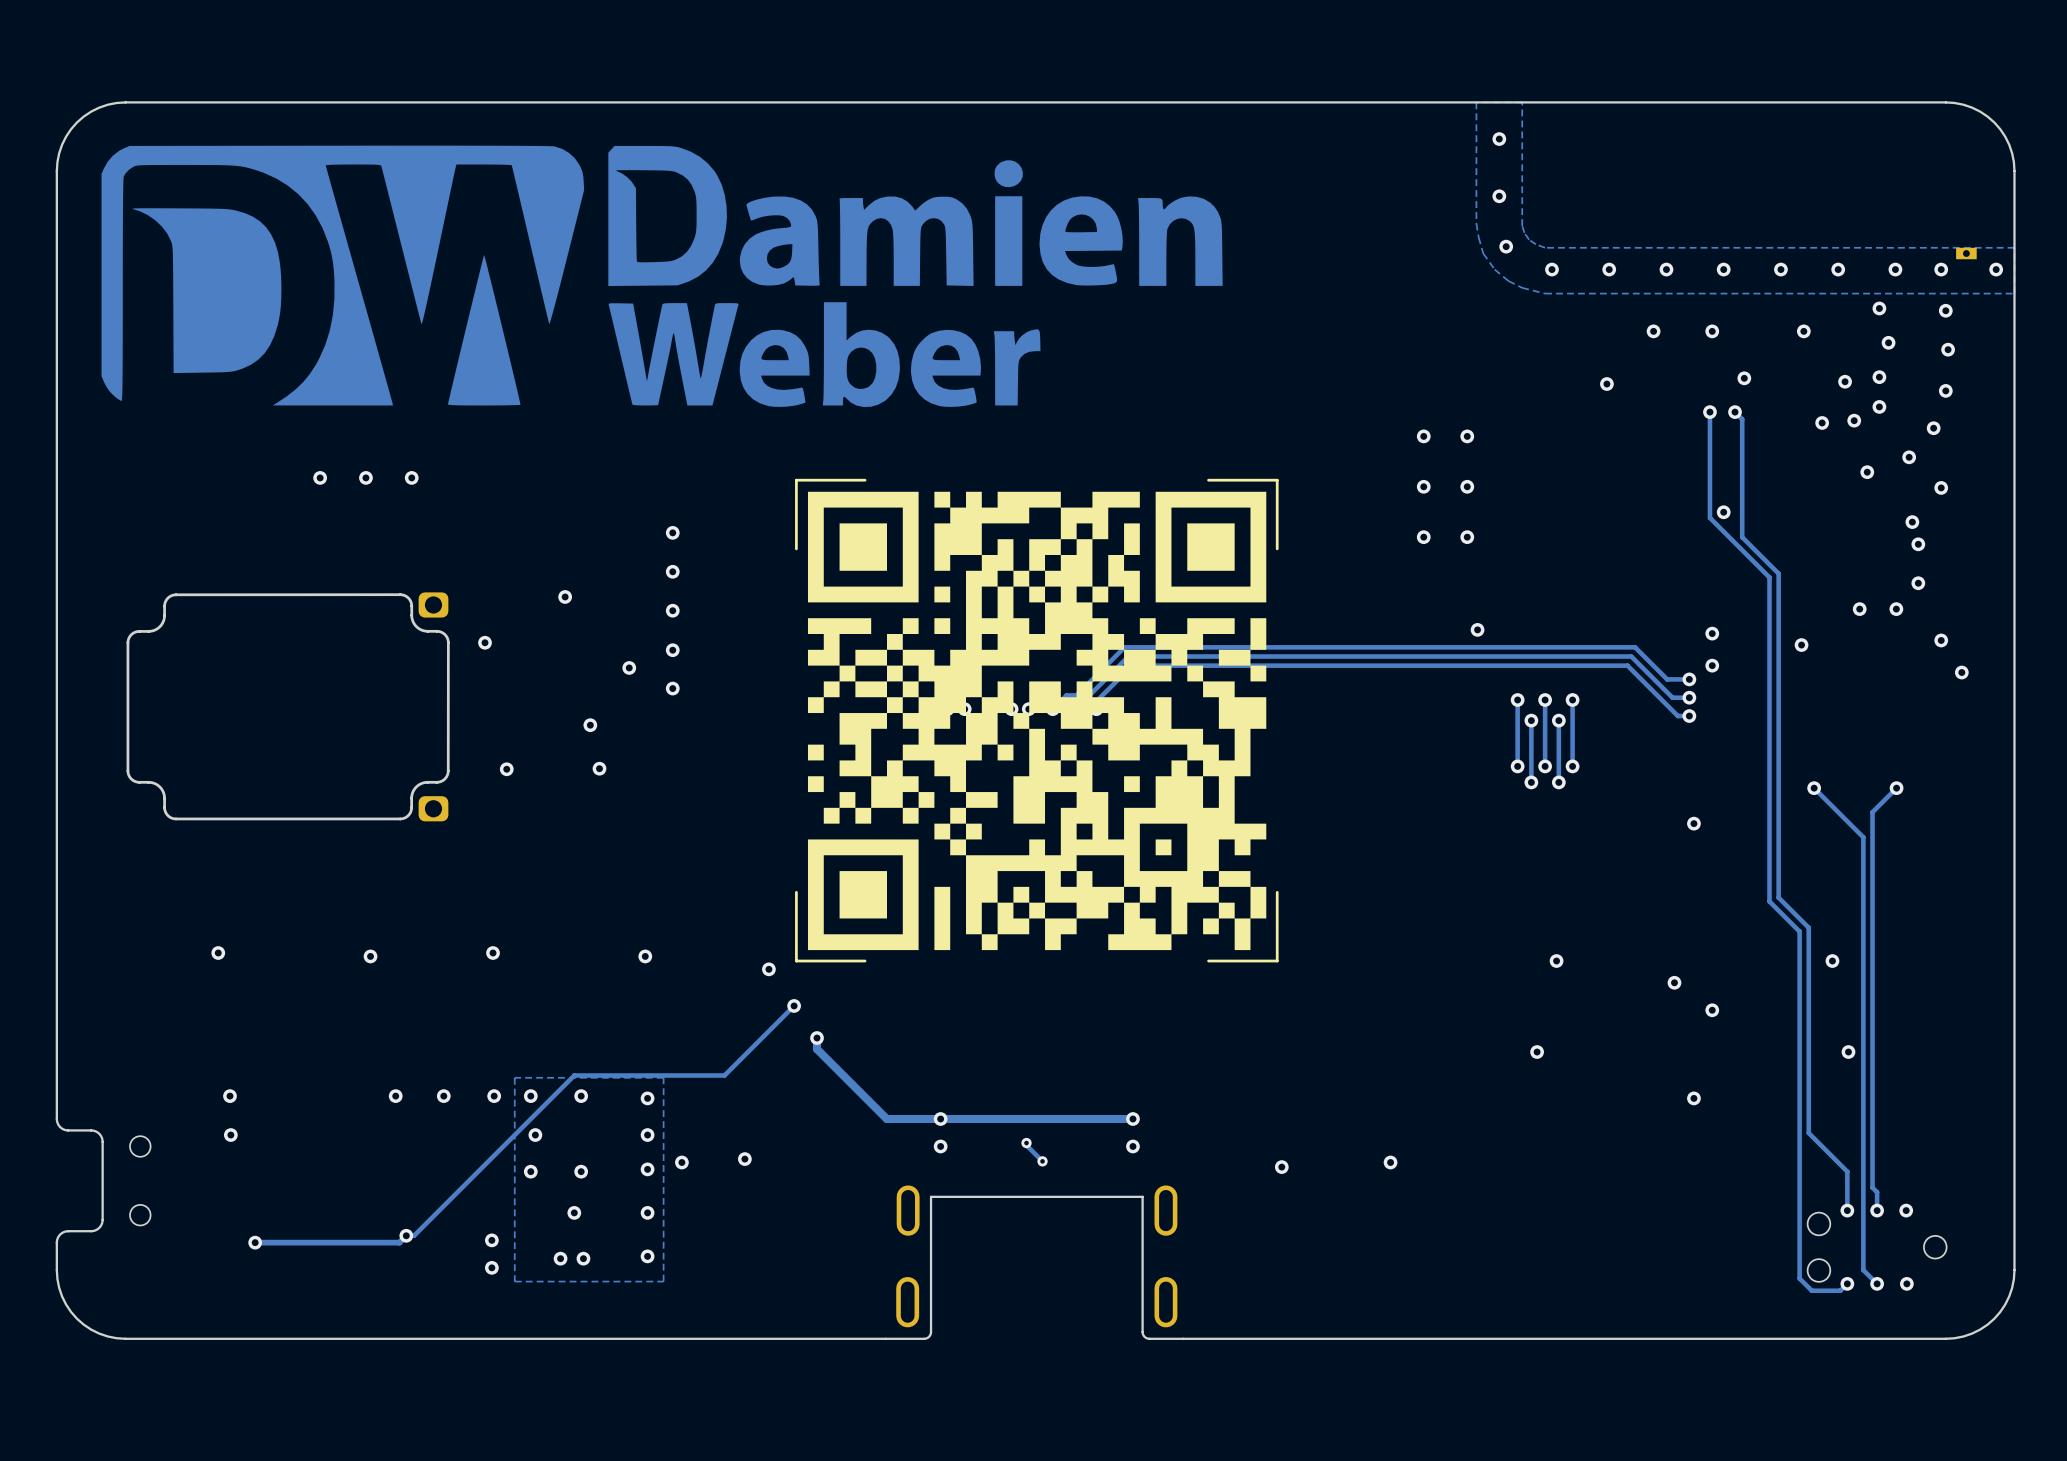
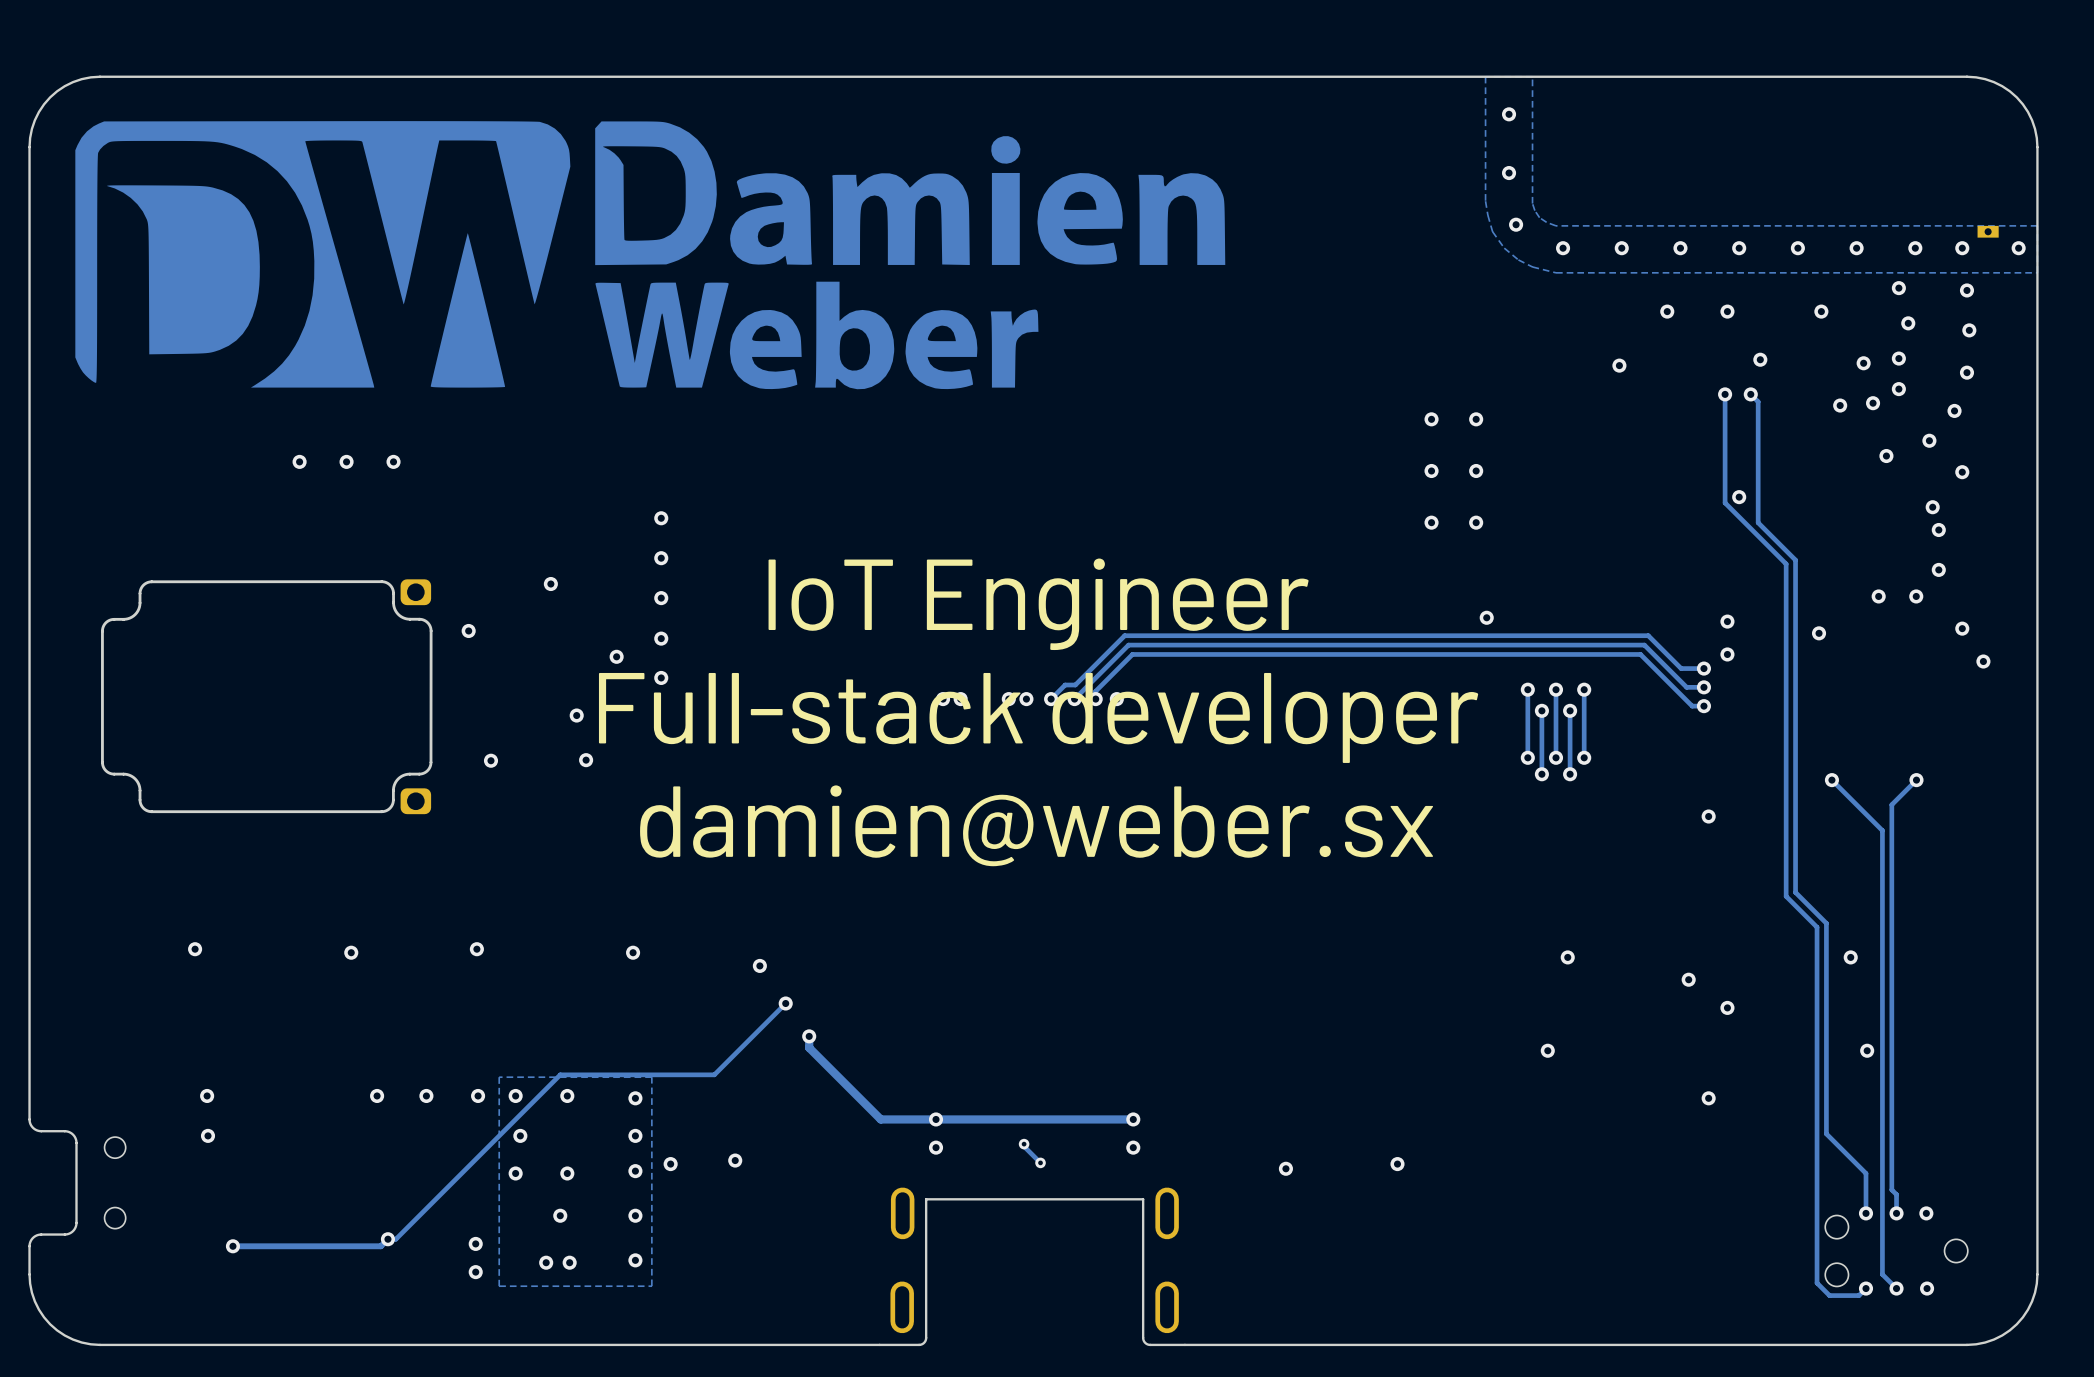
drawing: [795, 478, 1279, 963] -> none
text: none -> IoT Engineer (1038, 604)
text: none -> Full-stack developer (1038, 717)
text: none -> damien@weber.sx (1036, 825)

